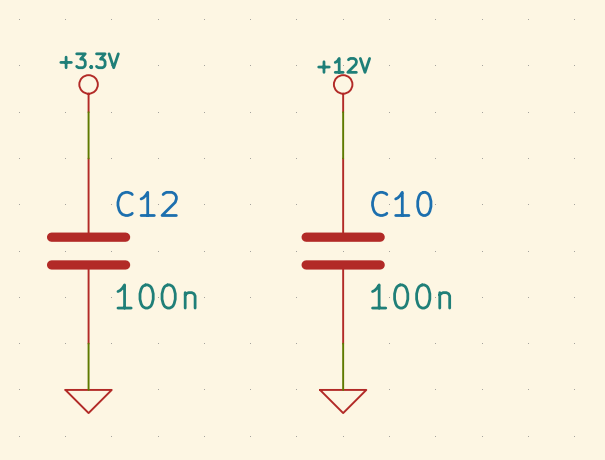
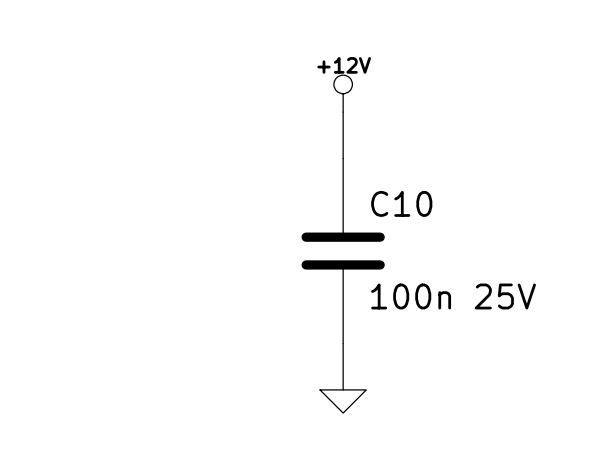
power symbol: +3.3V (88, 93) -> none
wire: (88, 112) (88, 158) -> none
C12: 100n (88, 251) -> none
C10 value: 100n (411, 296) -> 100n 25V (453, 296)
wire: (88, 343) (88, 389) -> none
power symbol: (88, 401) -> none

